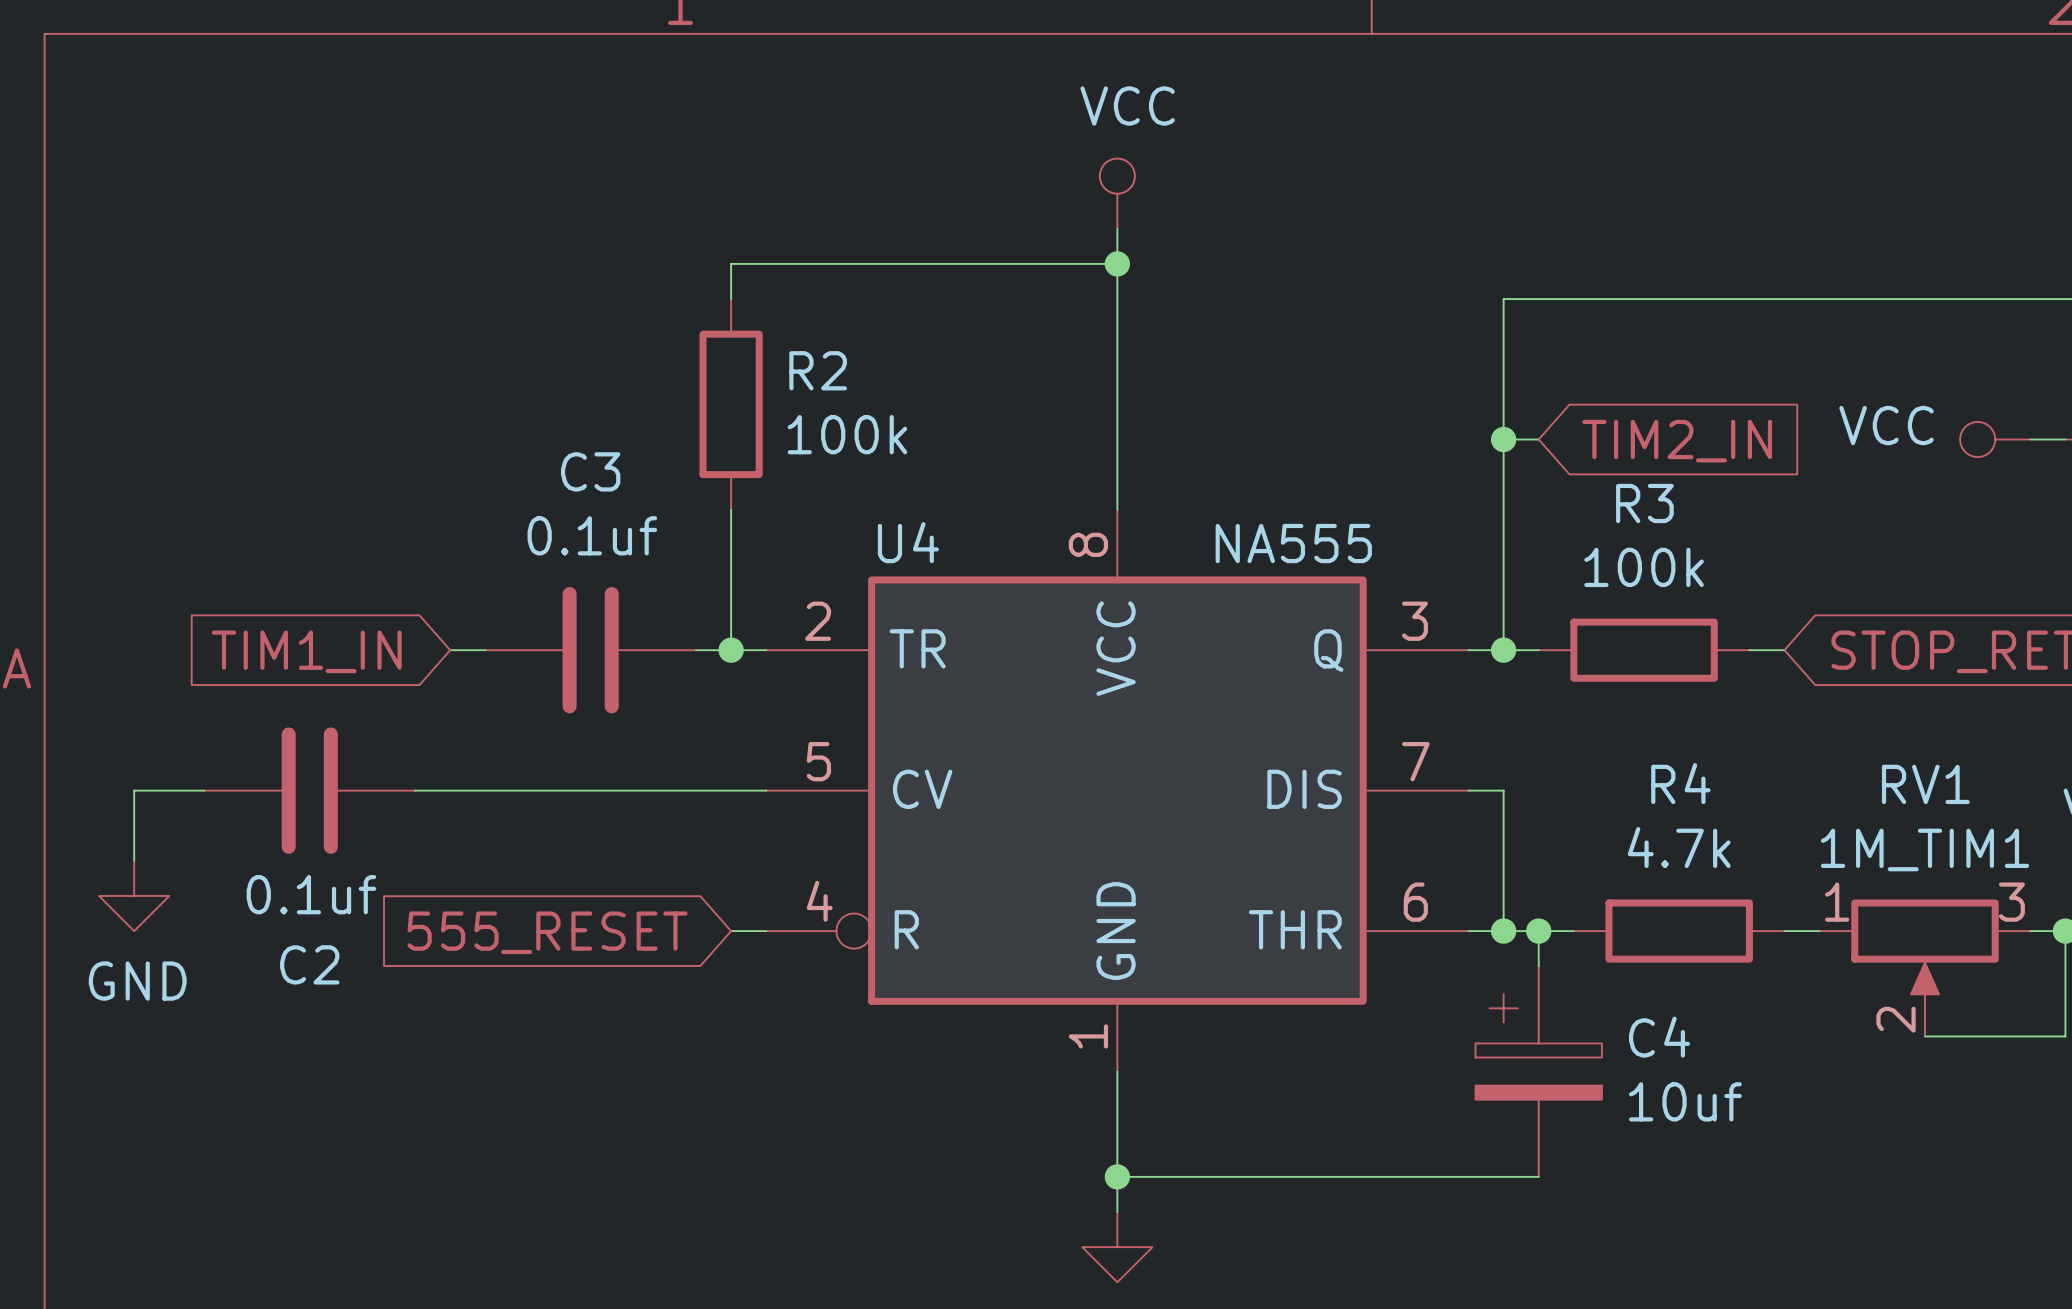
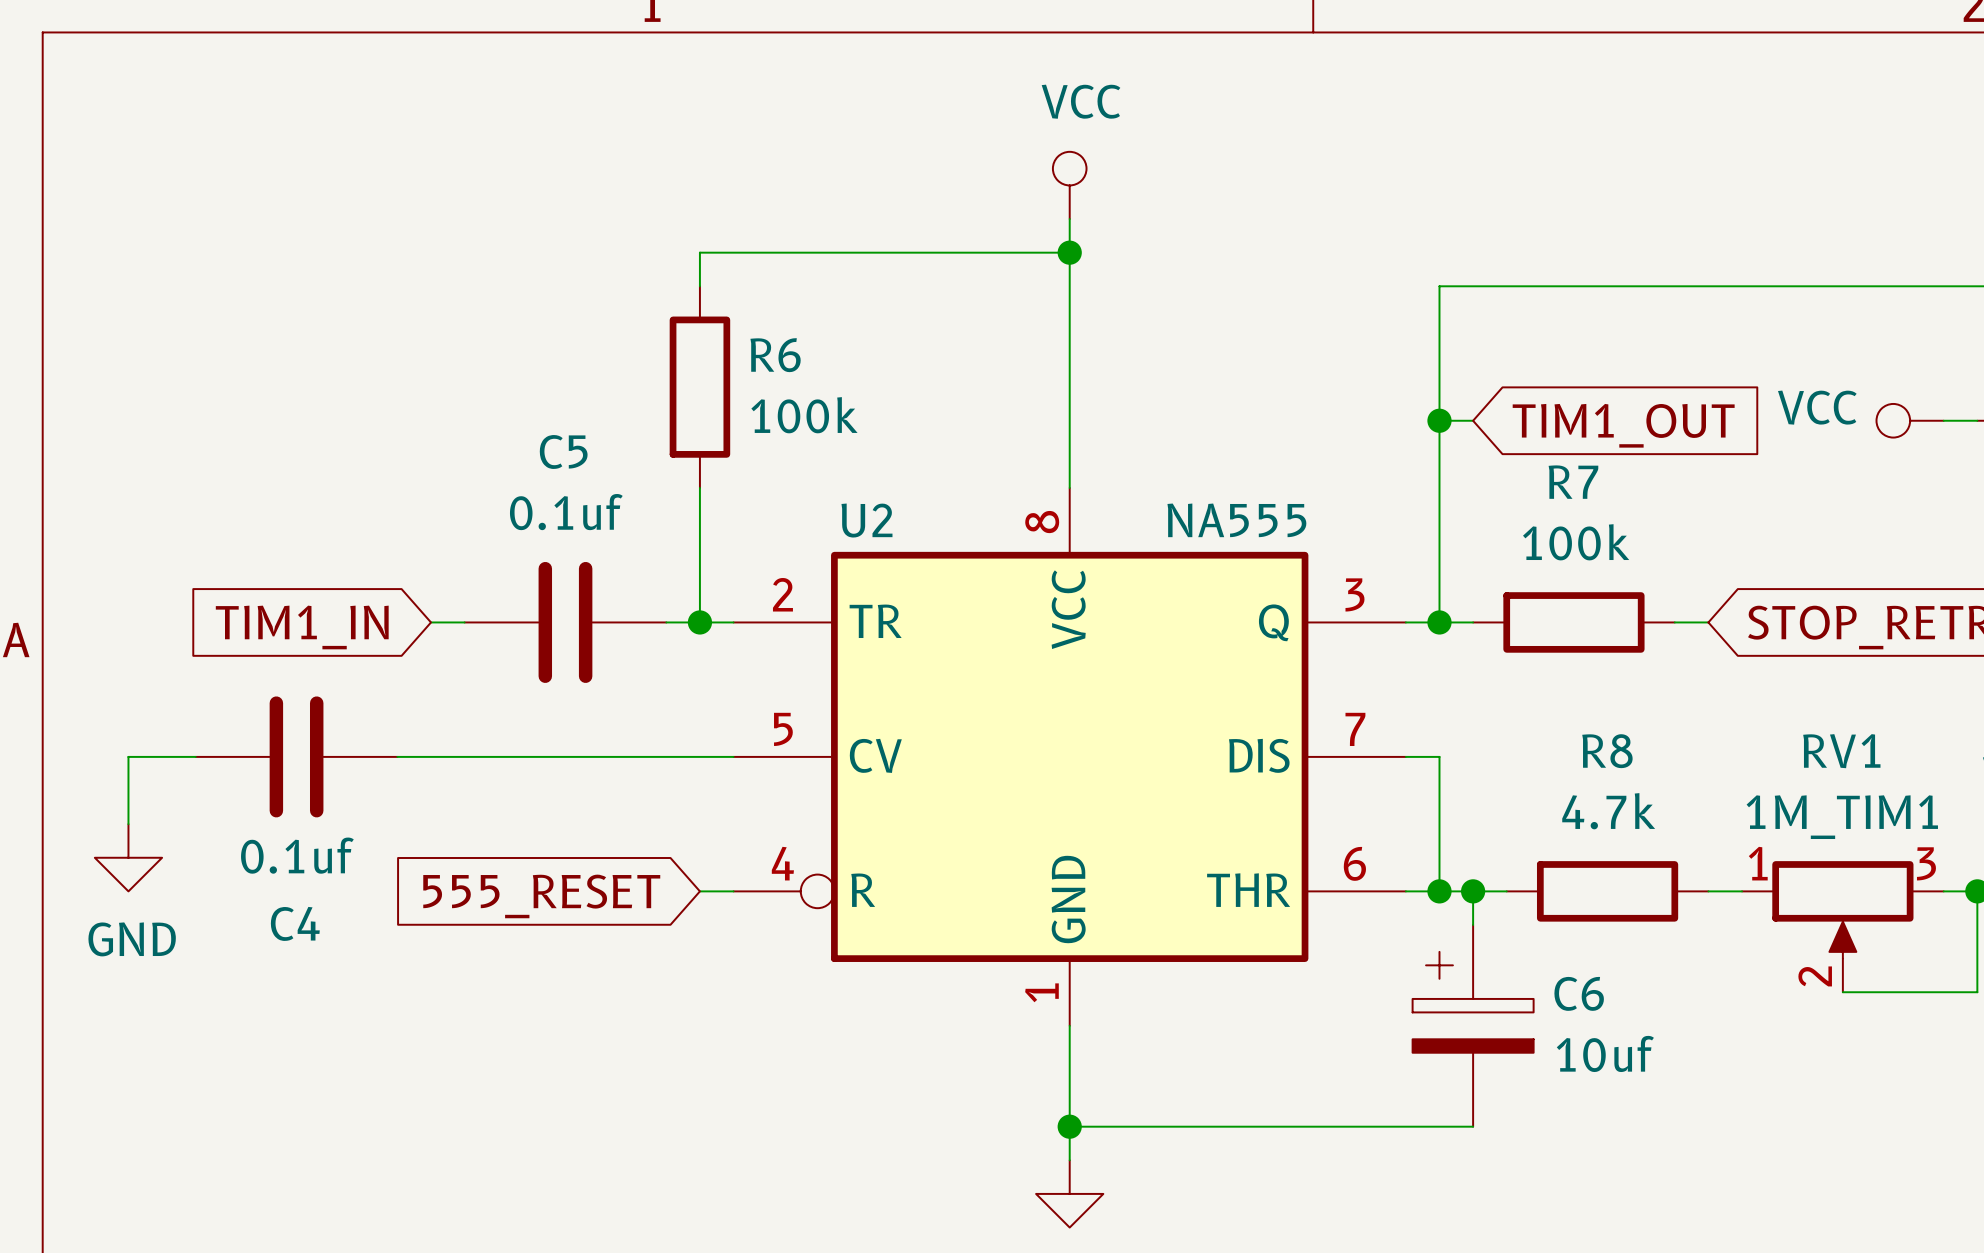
R2 name: R2 (818, 370) -> R6 (775, 355)
global label: TIM2_IN (1677, 441) -> TIM1_OUT (1623, 425)
C3 name: C3 (590, 471) -> C5 (563, 451)
R3 name: R3 (1644, 503) -> R7 (1573, 482)
U4 name: U4 (908, 542) -> U2 (866, 520)
R4 name: R4 (1680, 783) -> R8 (1607, 751)
C2 name: C2 (309, 964) -> C4 (295, 923)
C4 name: C4 (1659, 1037) -> C6 (1579, 993)

